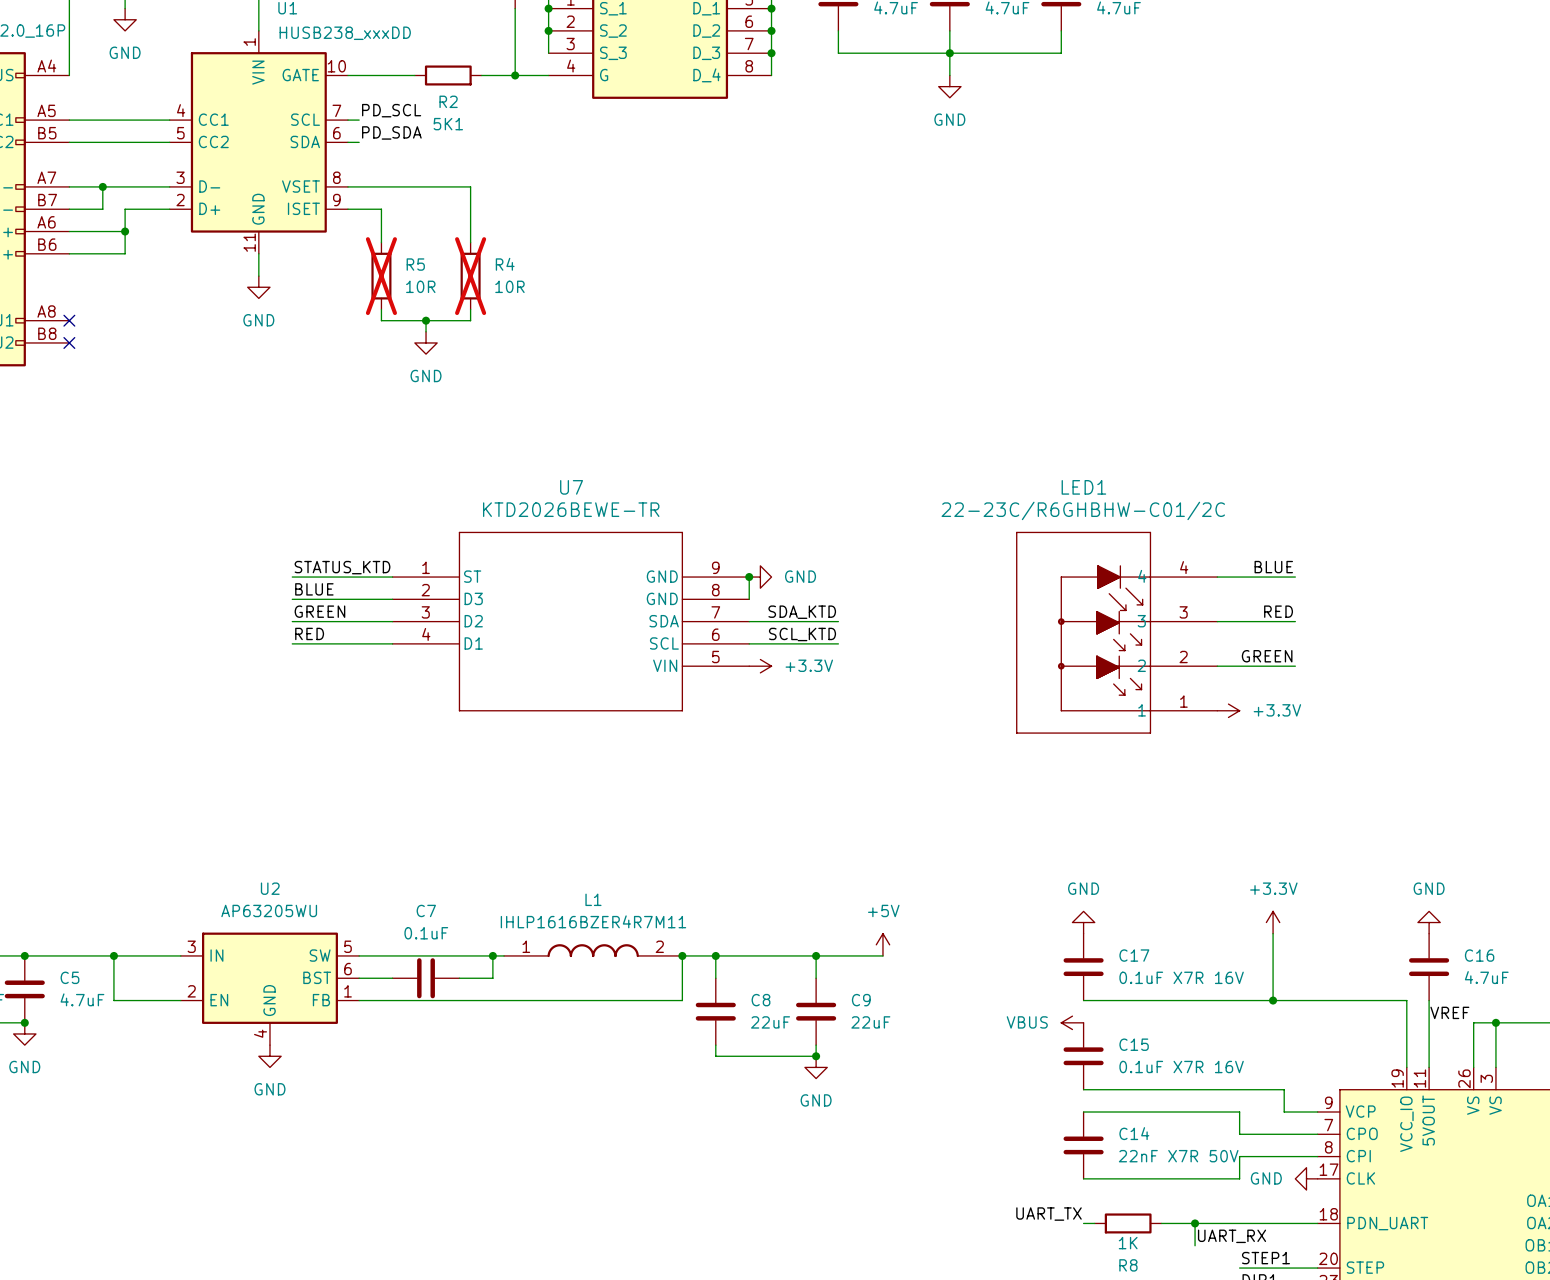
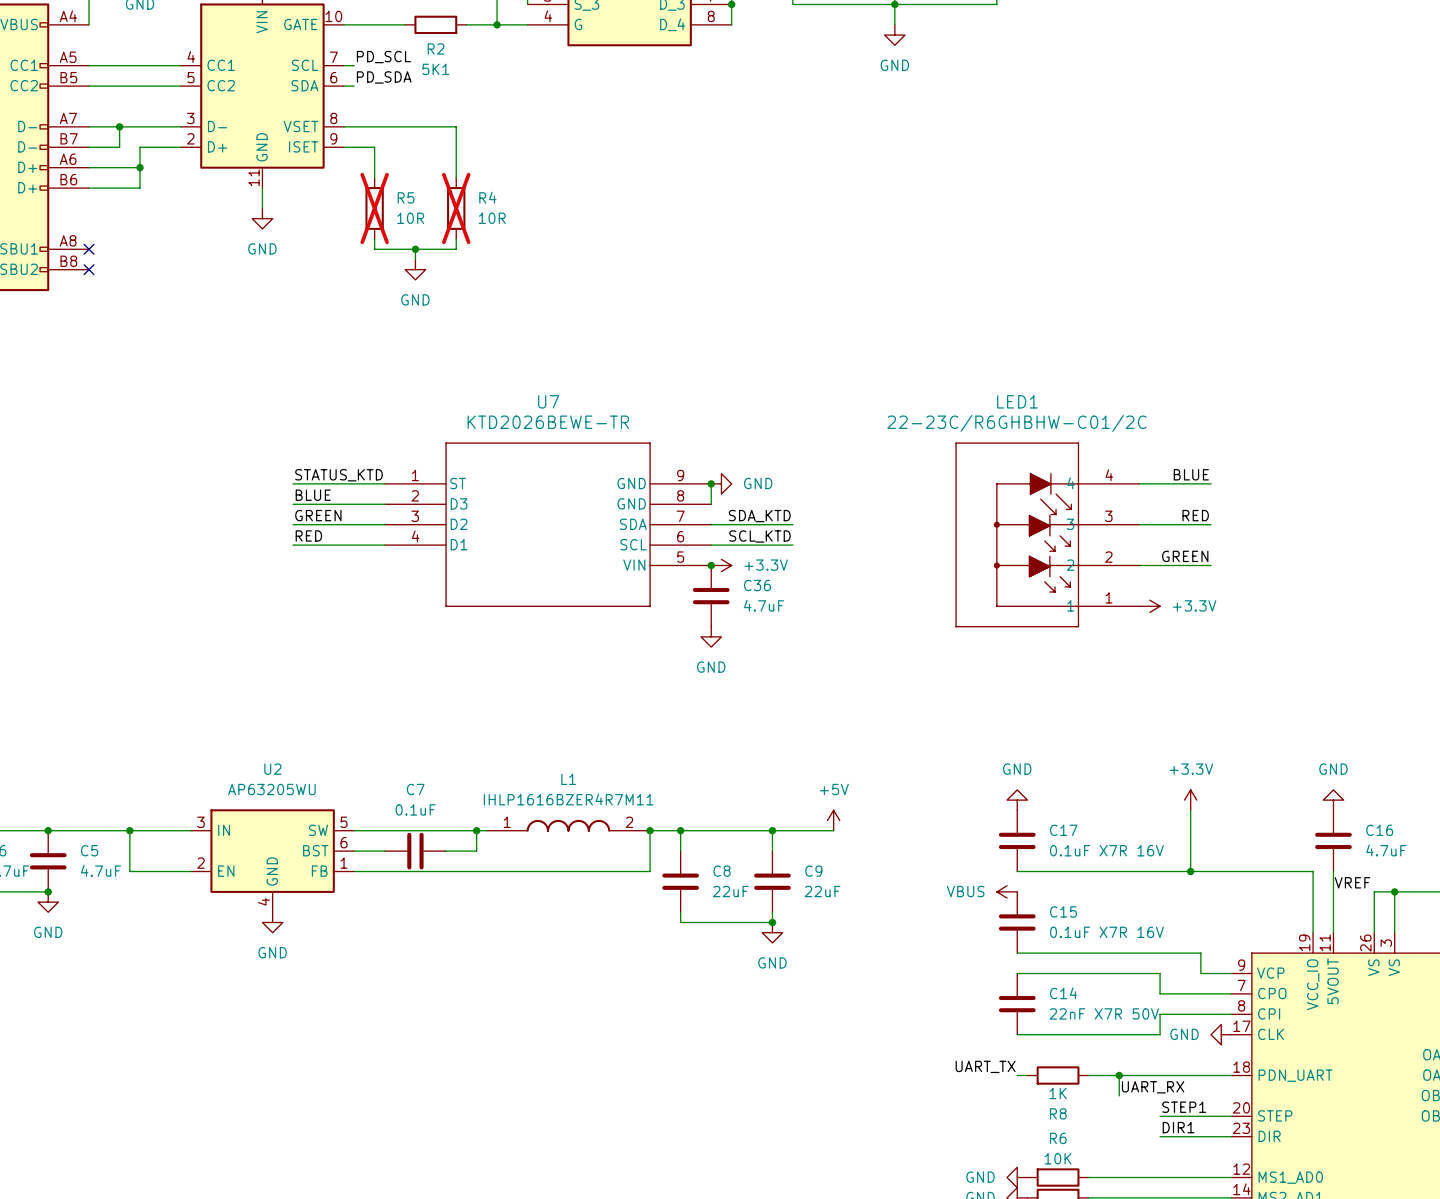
junction: none -> (711, 565)
C36: none -> 4.7uF (711, 596)
power symbol: none -> GND (711, 636)

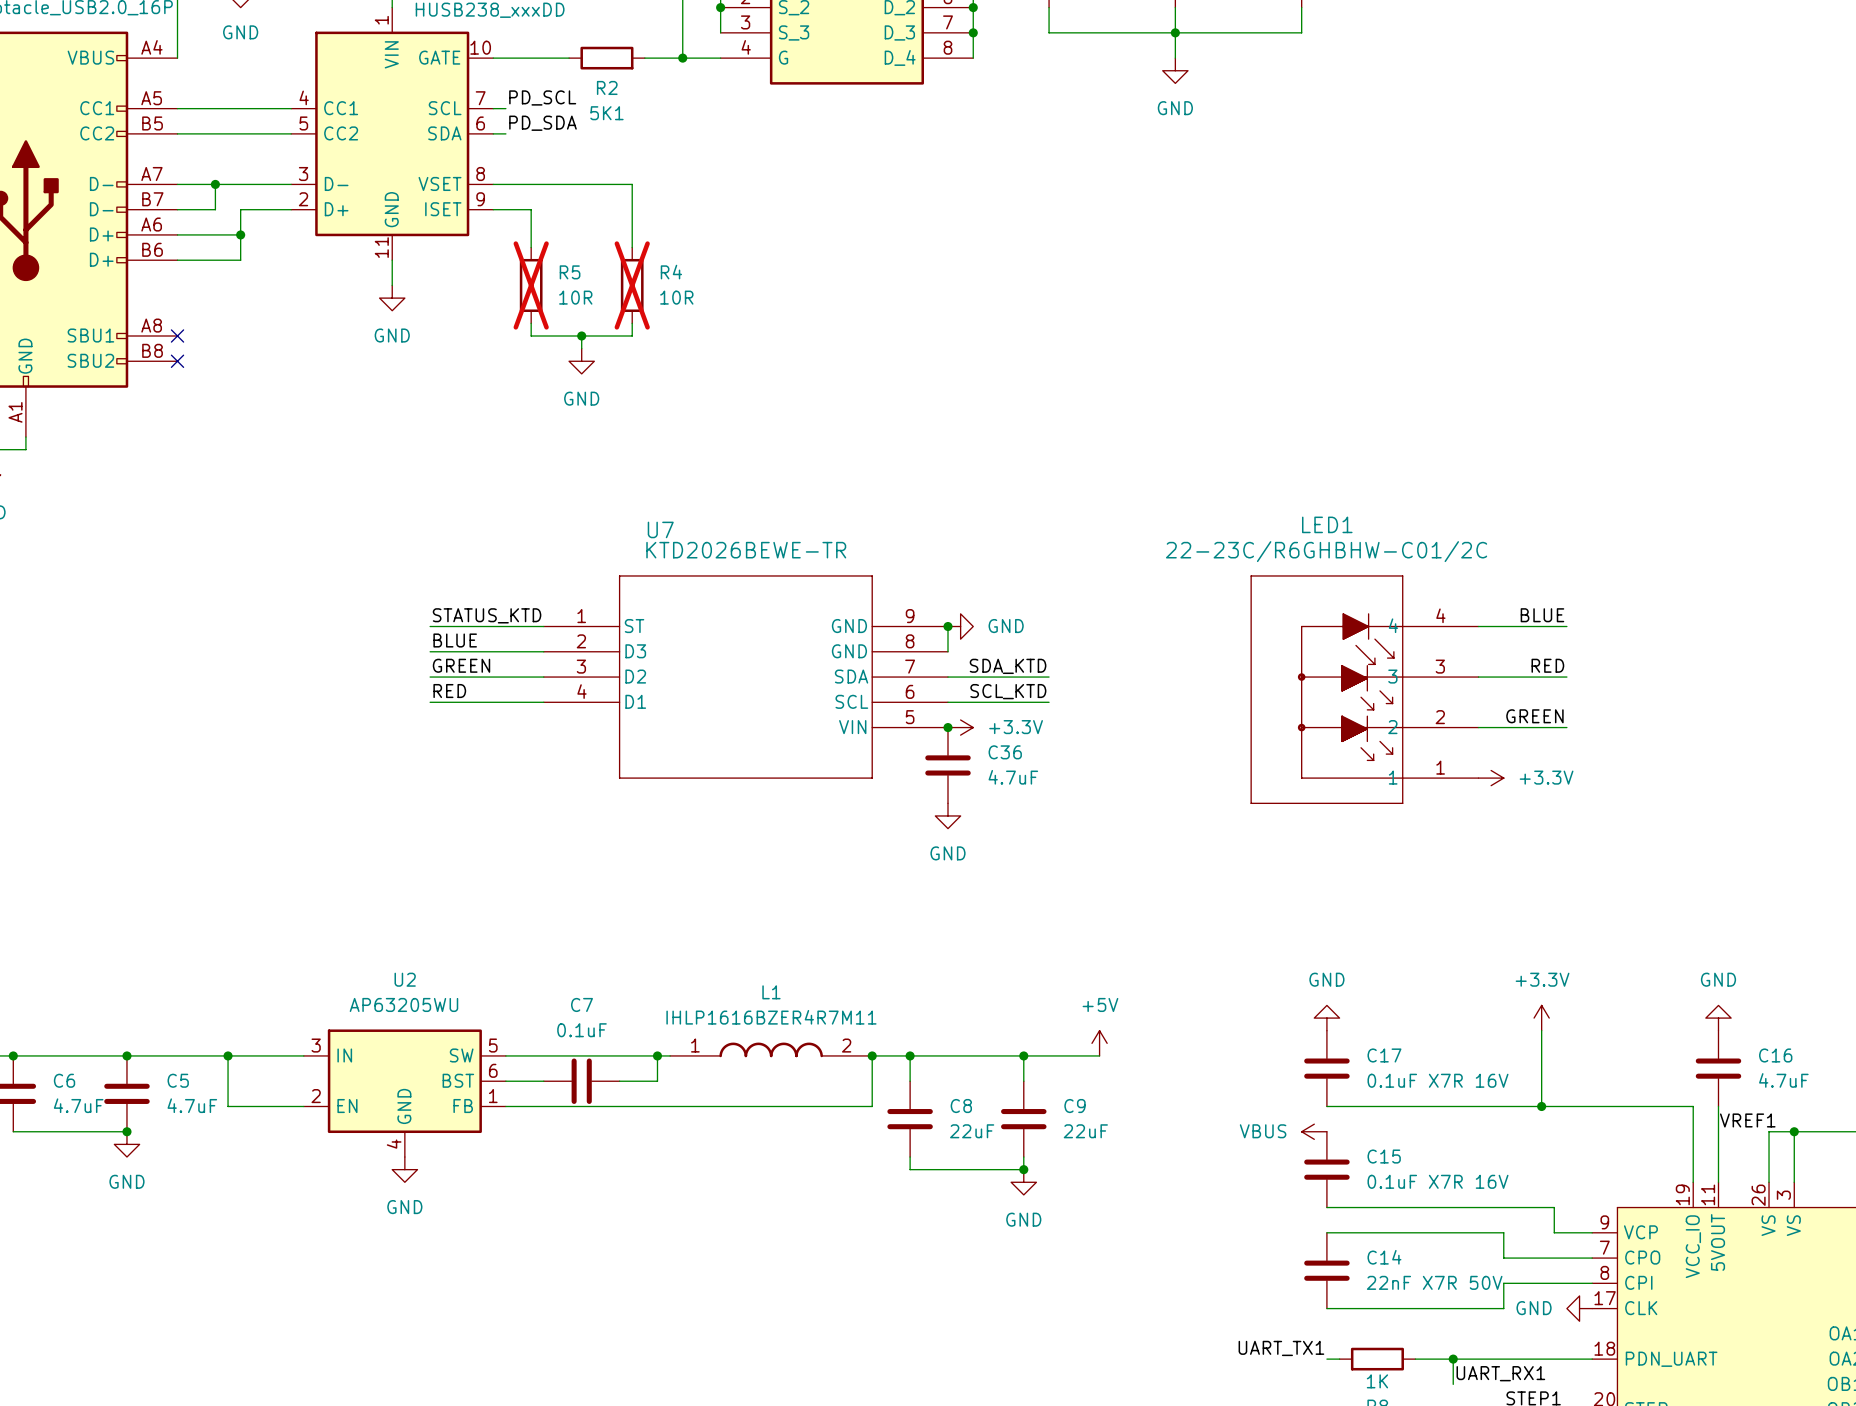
U7 name position: U7 (548, 401) -> U7 (660, 529)
label: VREF (1352, 882) -> VREF1 (1747, 1120)
label: UART_TX (985, 1066) -> UART_TX1 (1281, 1348)
label: UART_RX (1153, 1087) -> UART_RX1 (1500, 1373)

